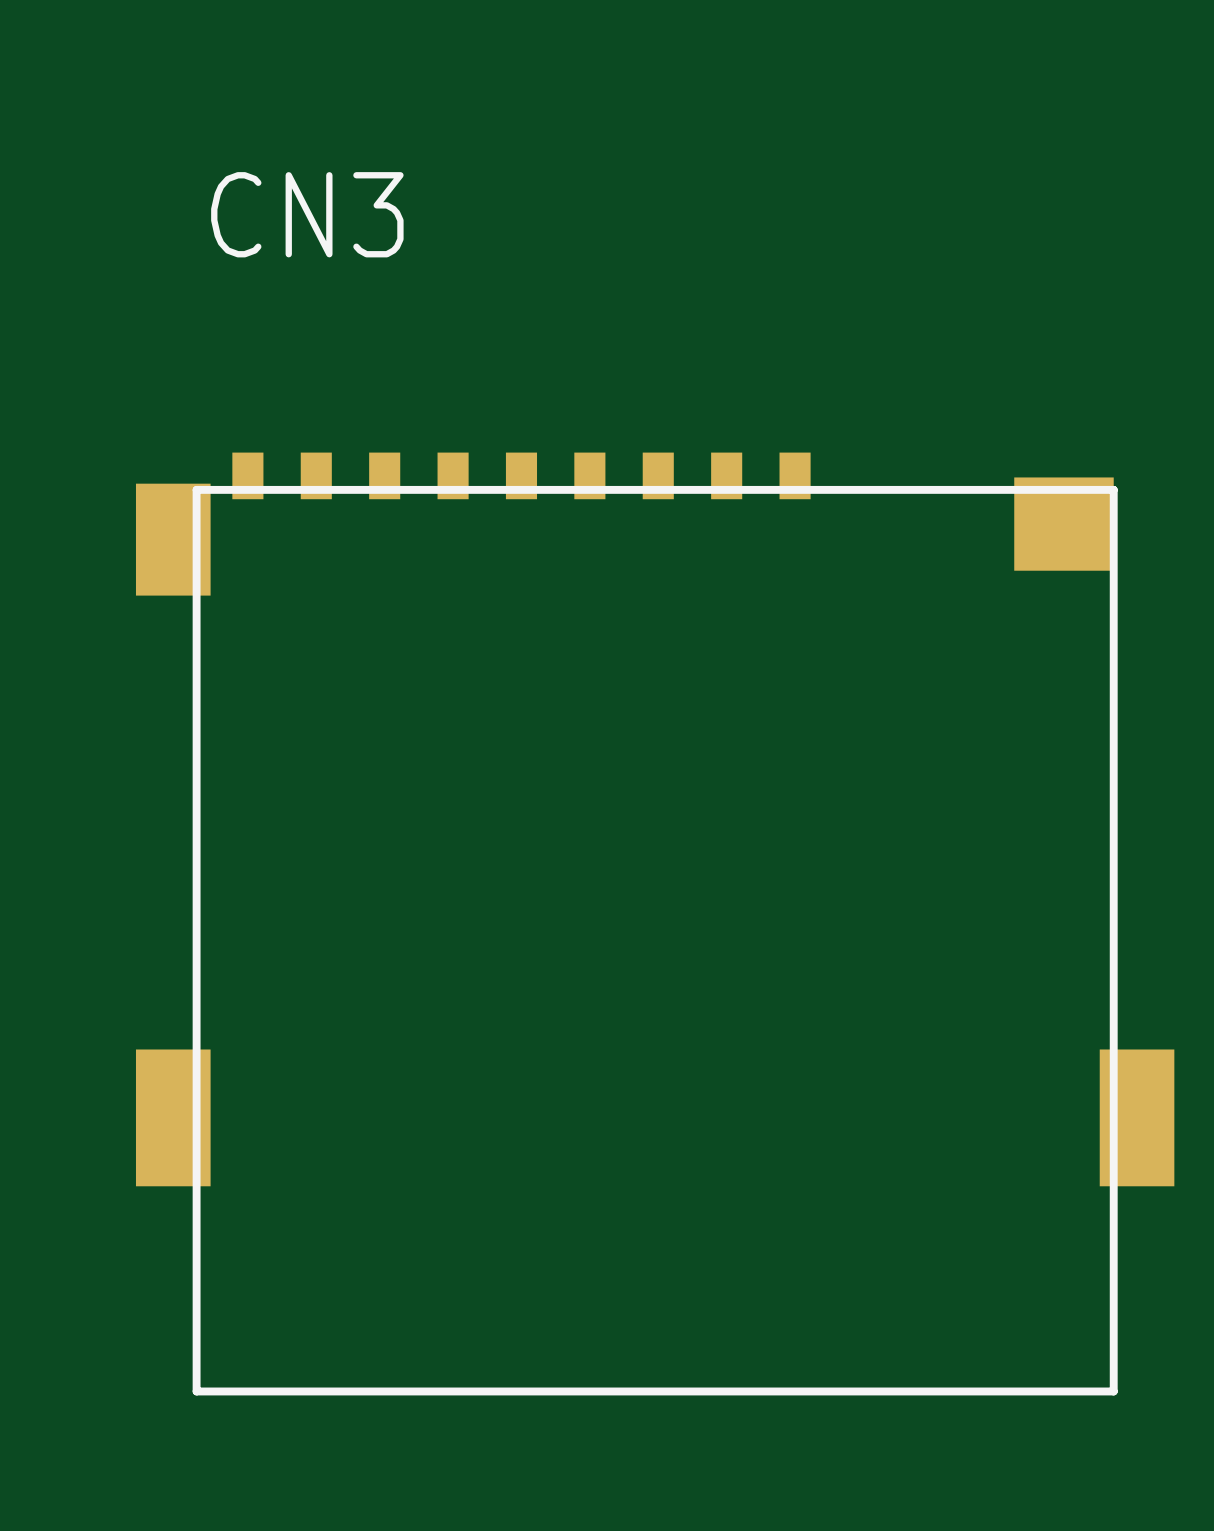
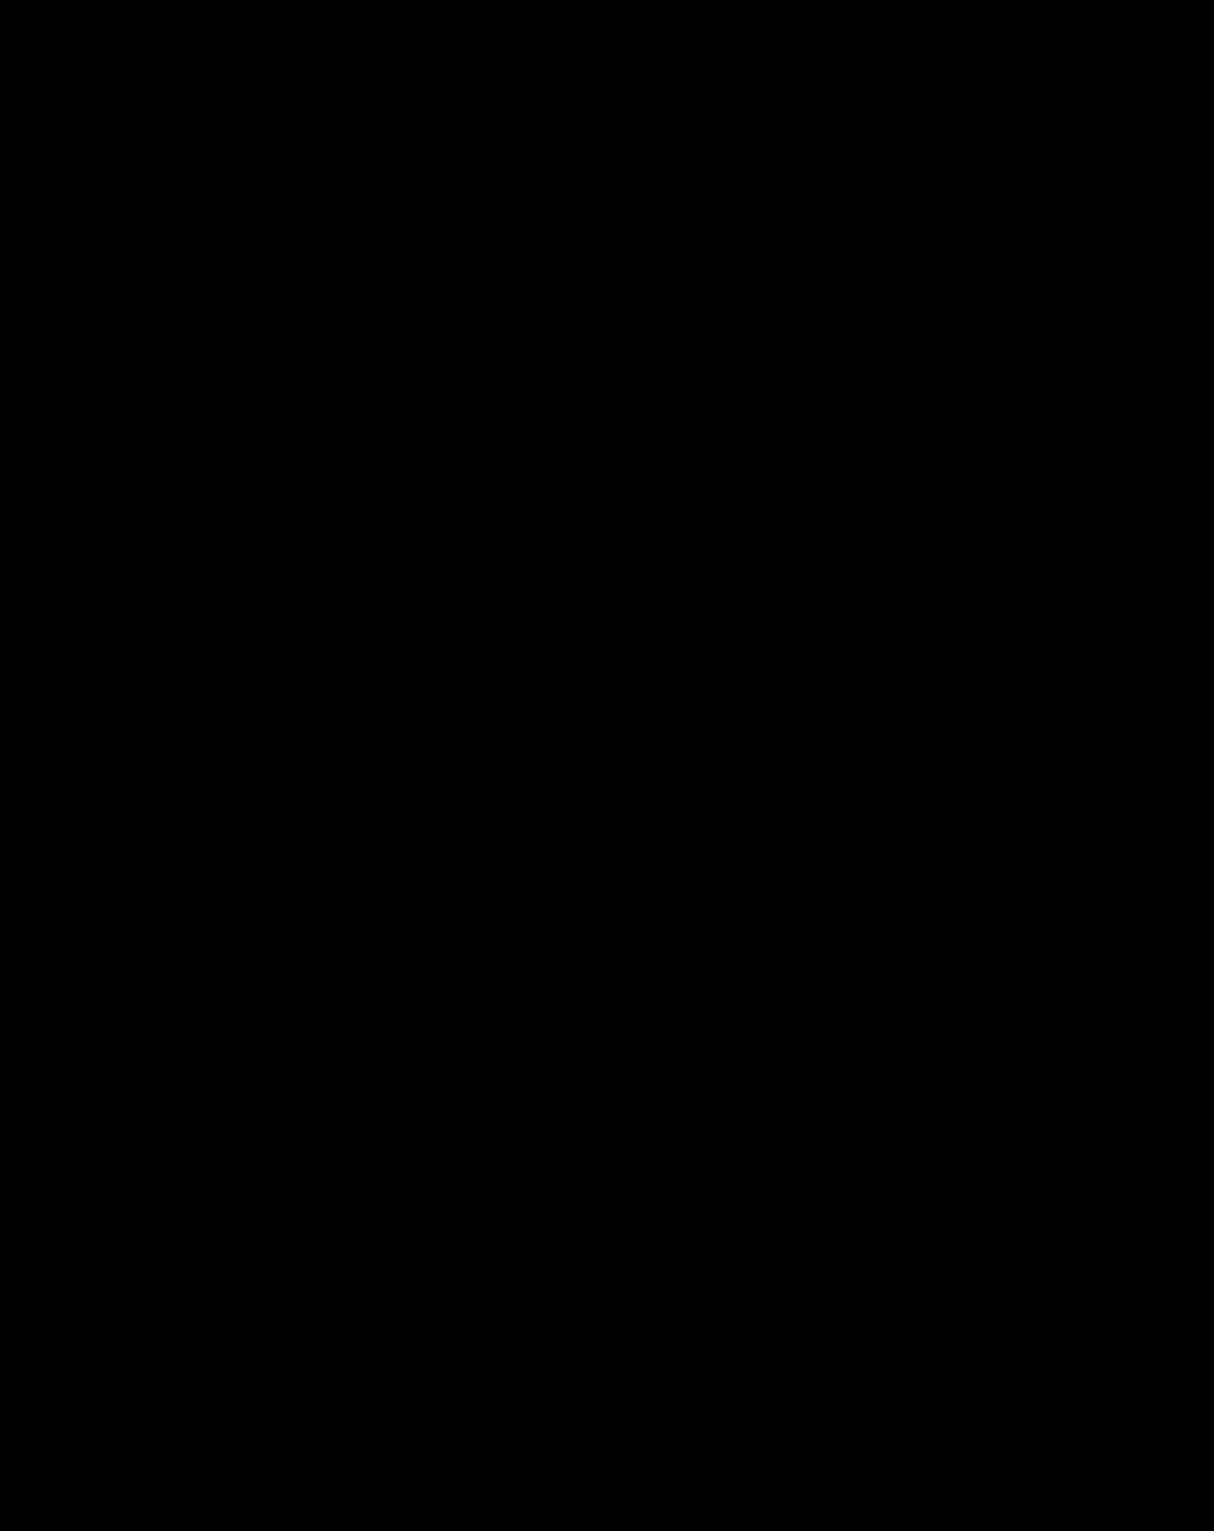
CN3: (655, 924) -> none

